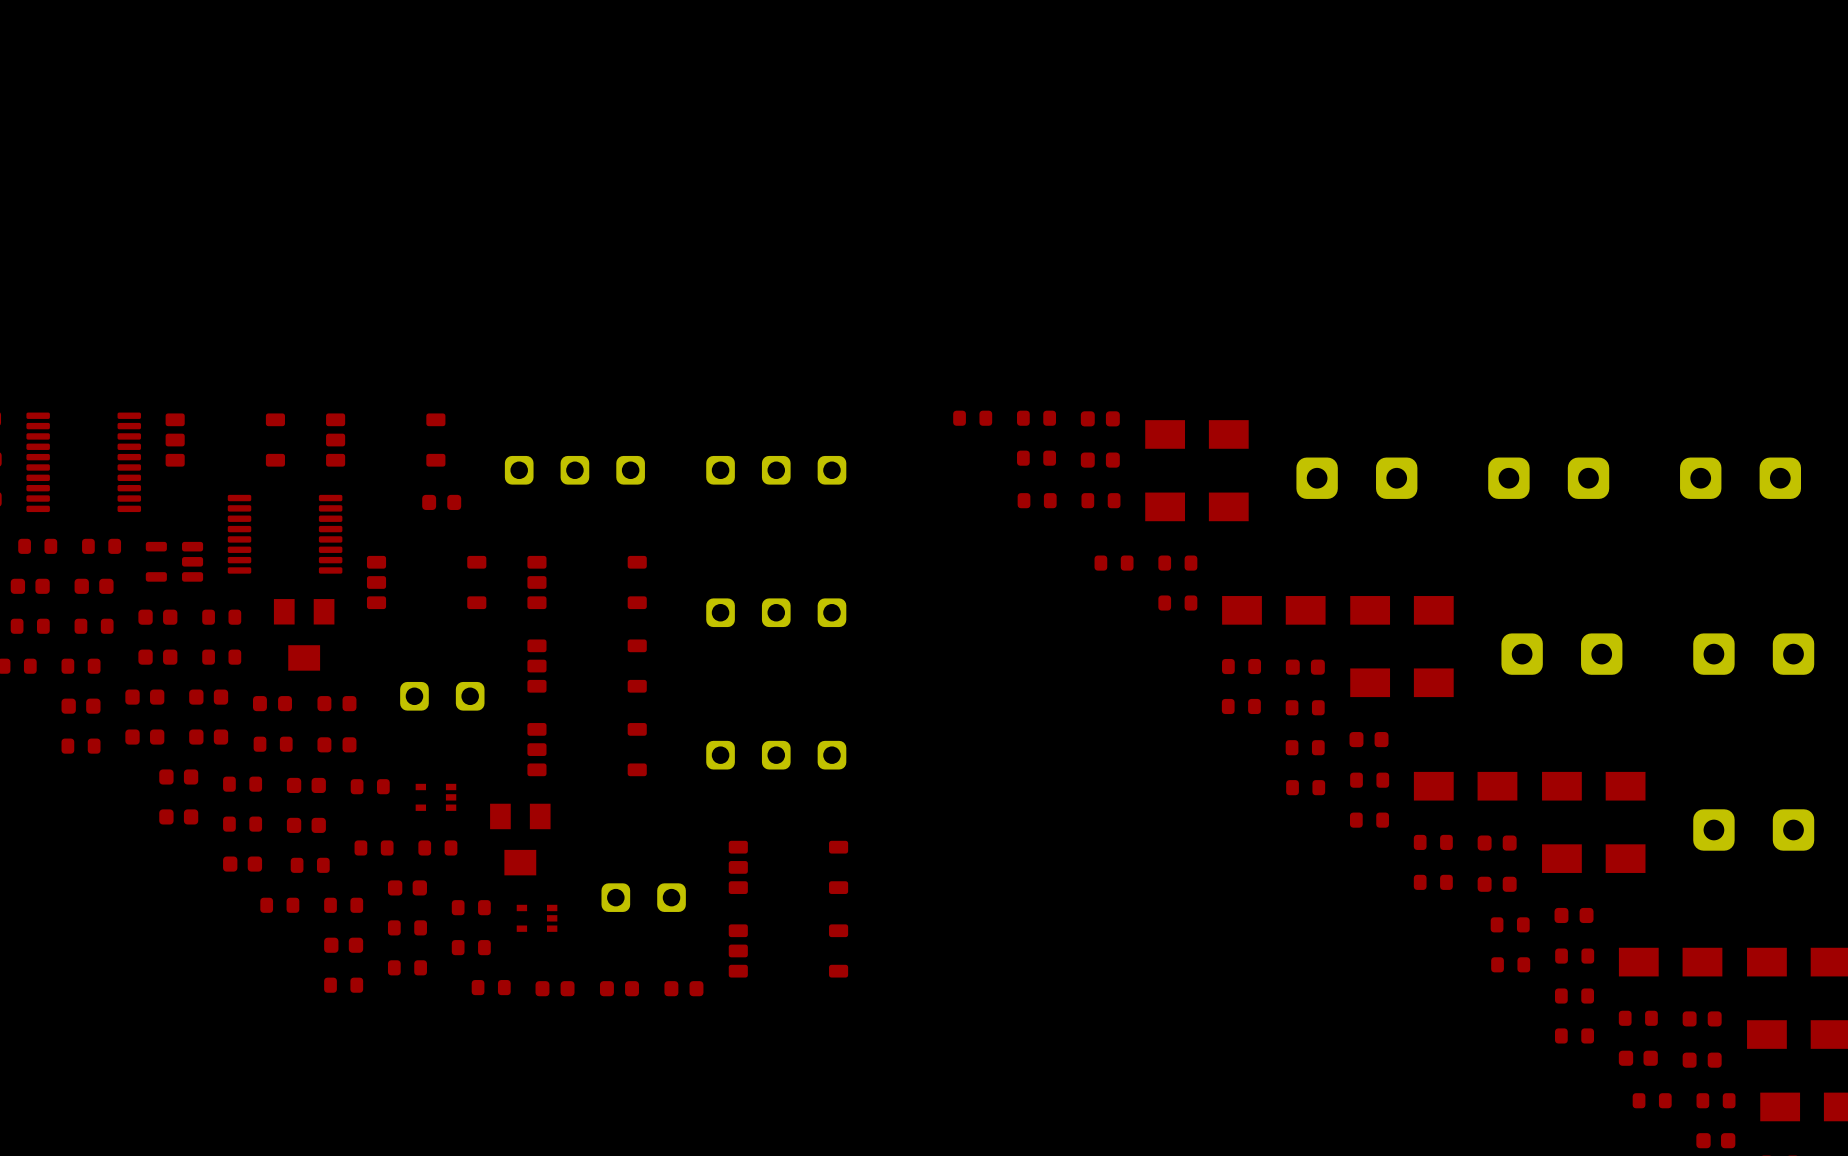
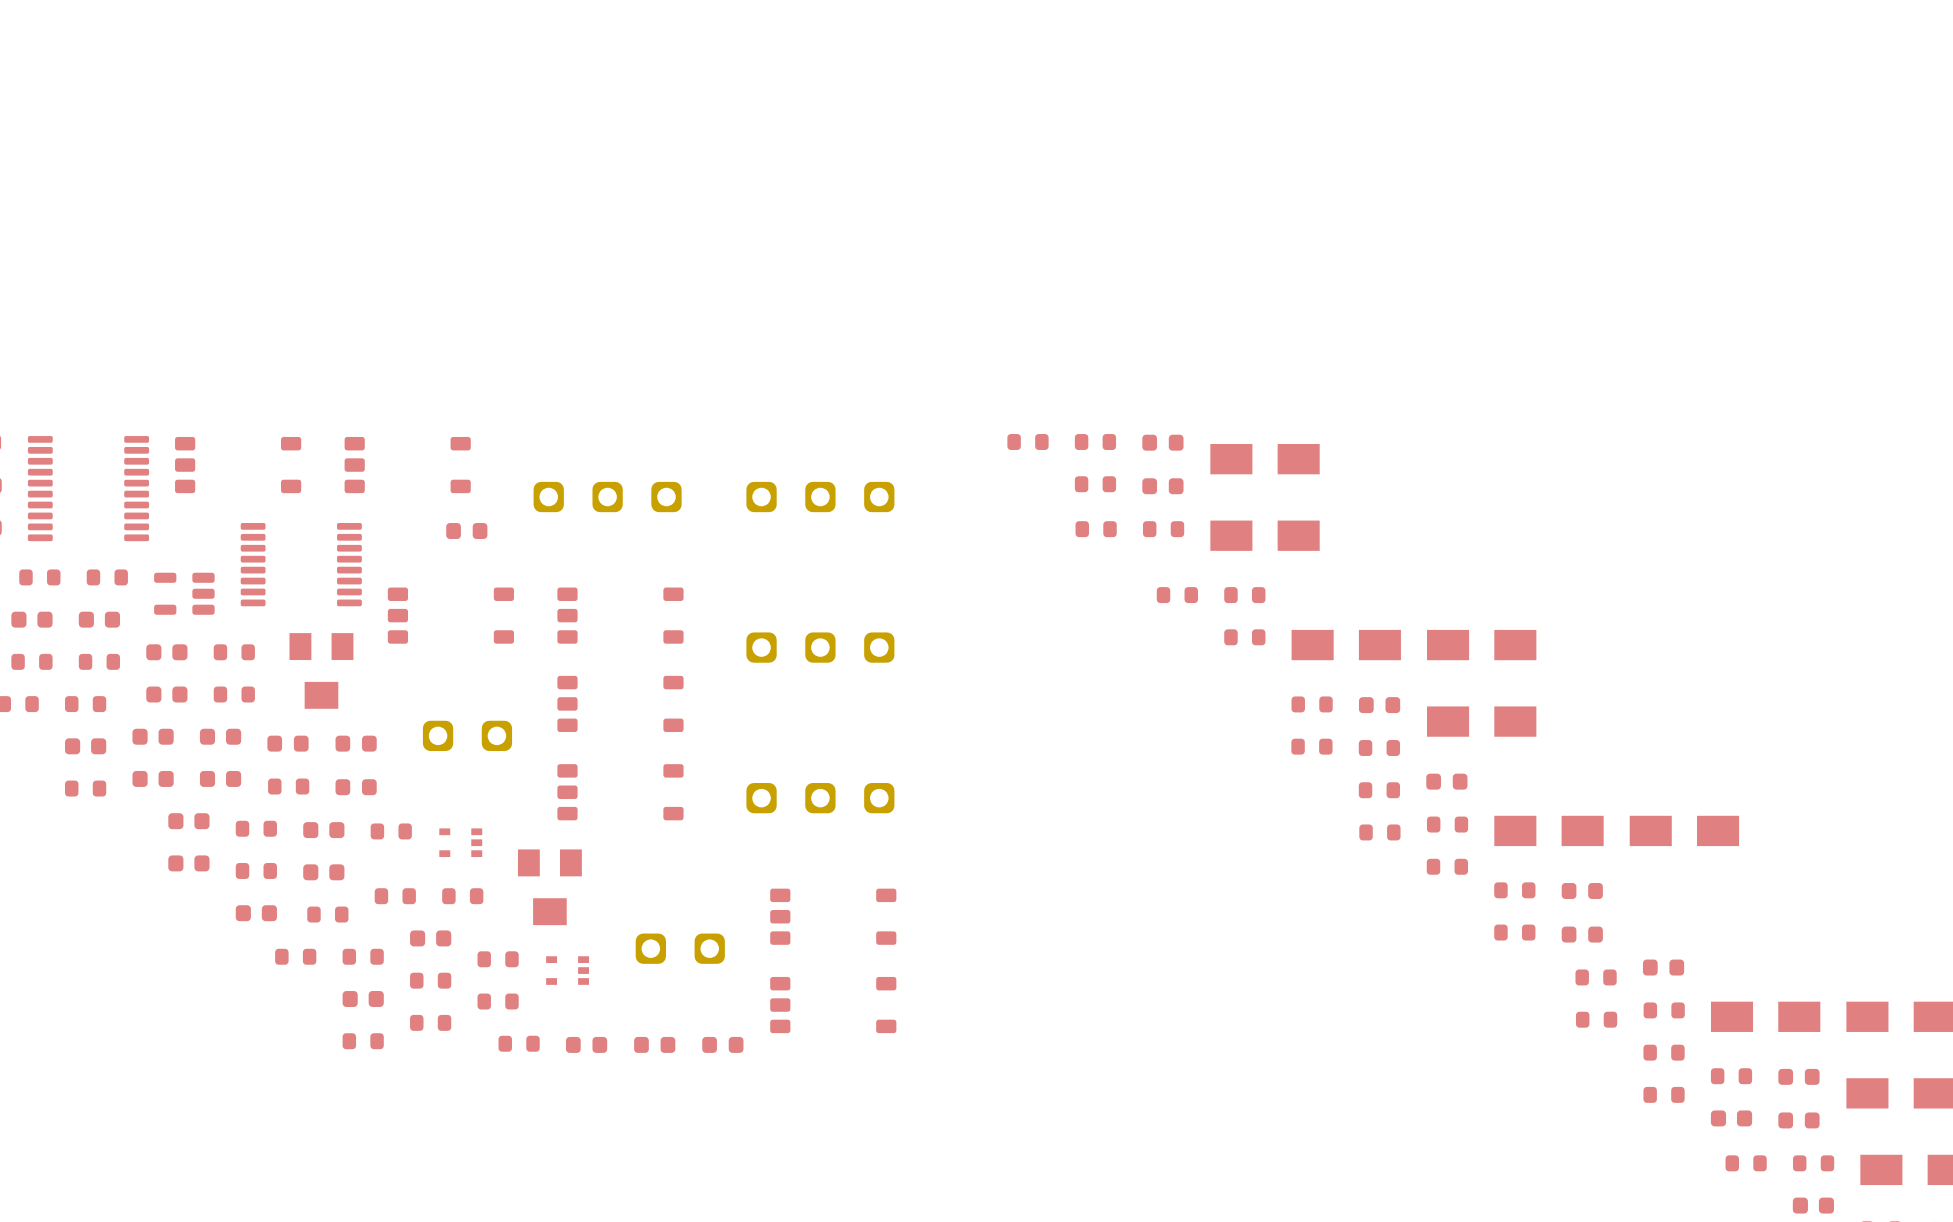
part: (1356, 478) -> none
part: (1548, 478) -> none
part: (1740, 478) -> none
part: (1561, 654) -> none
part: (1753, 654) -> none
part: (1753, 829) -> none
part: (1593, 858) -> none

